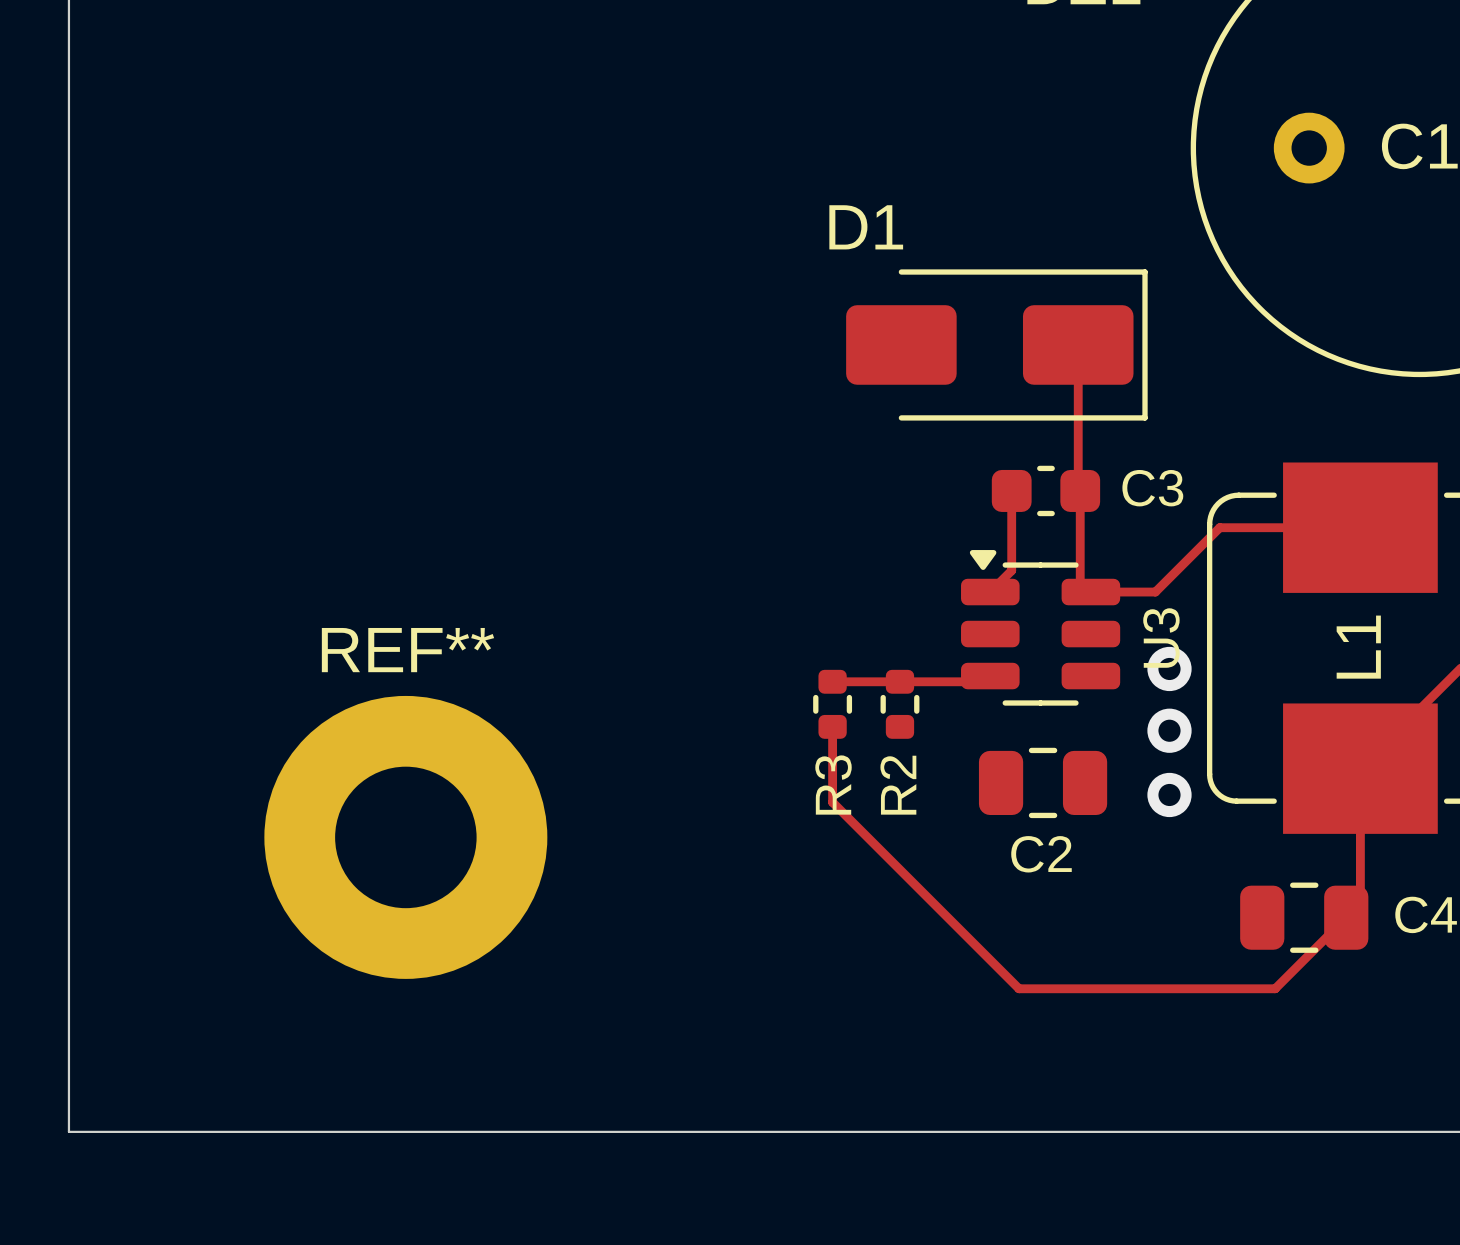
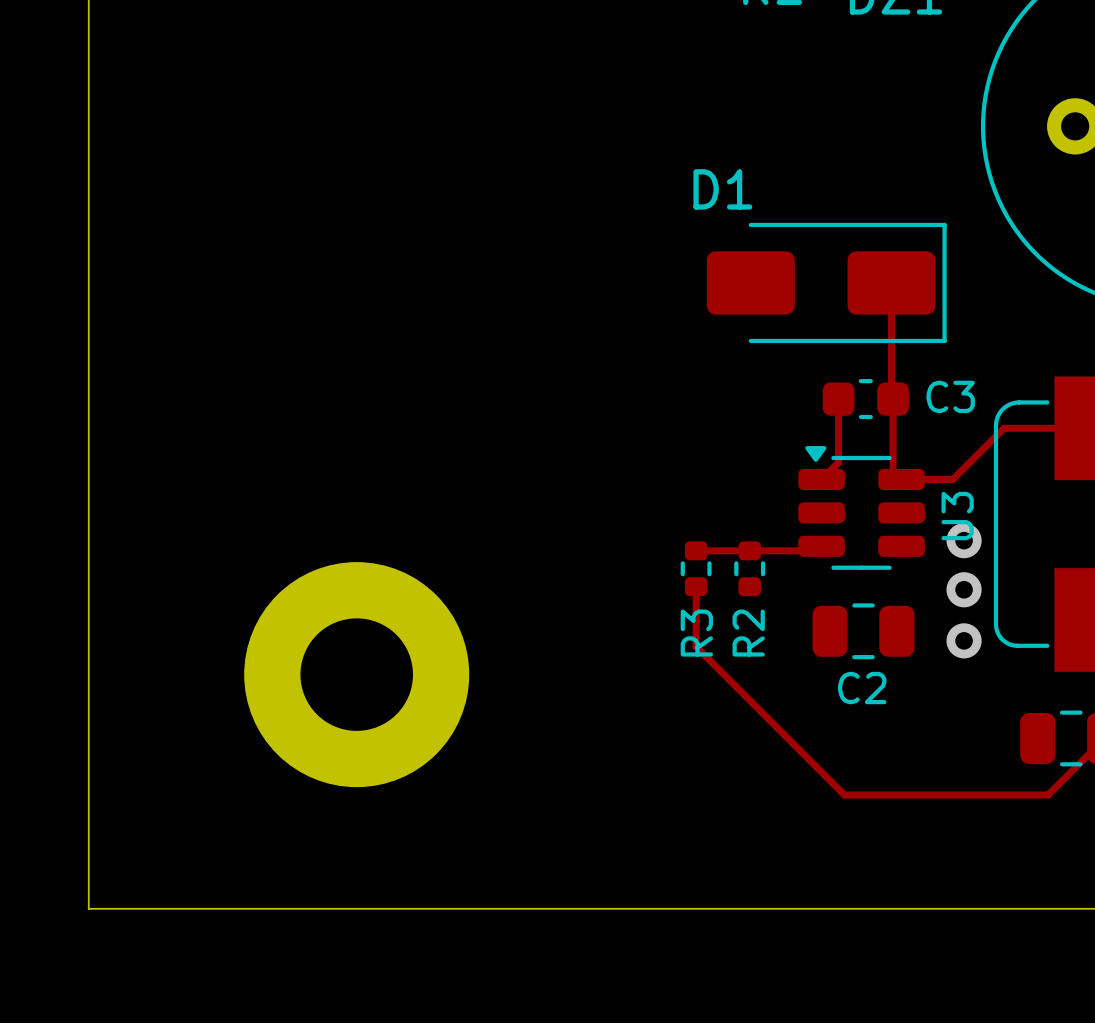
REF** name: REF** (407, 650) -> none

